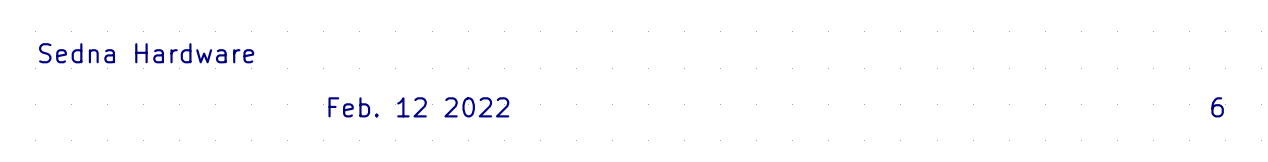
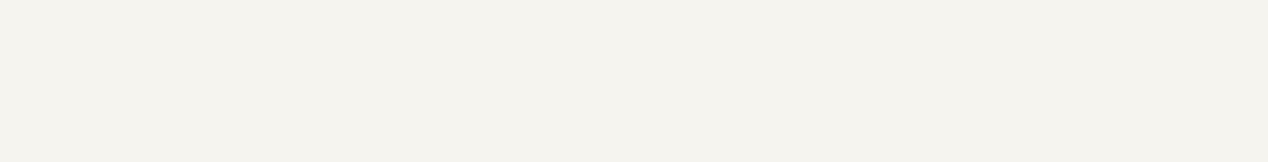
text: Sedna Hardware (146, 53) -> none
text: Feb. 12 2022 (418, 107) -> none
text: 6 (1217, 107) -> none

